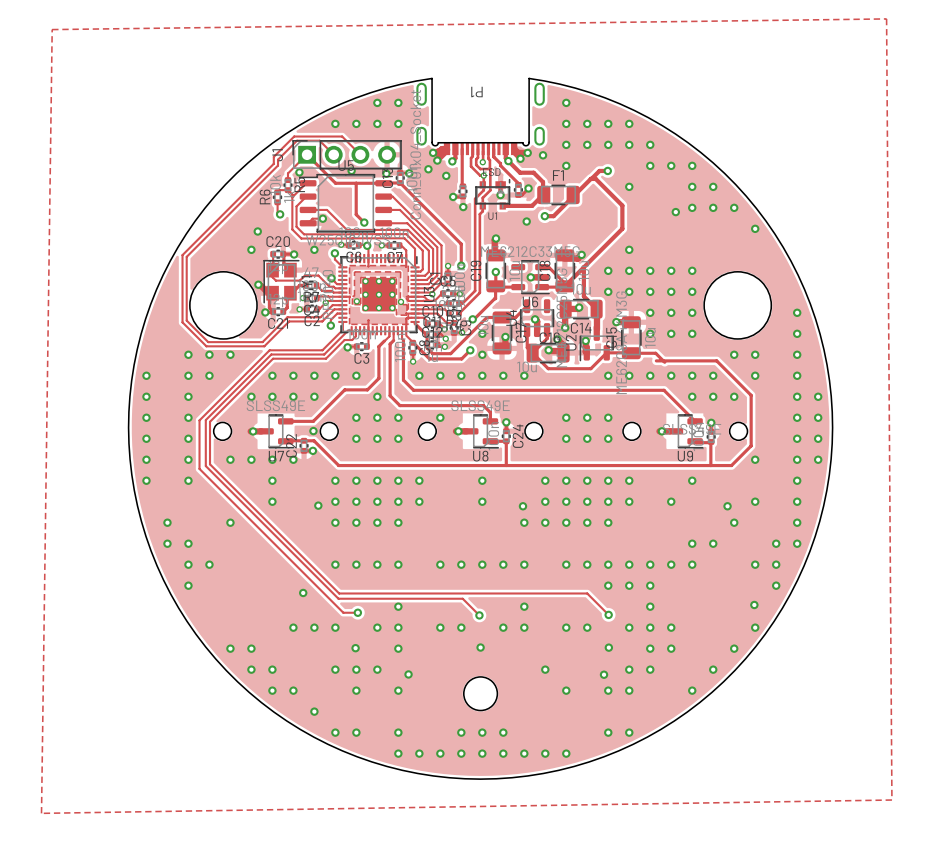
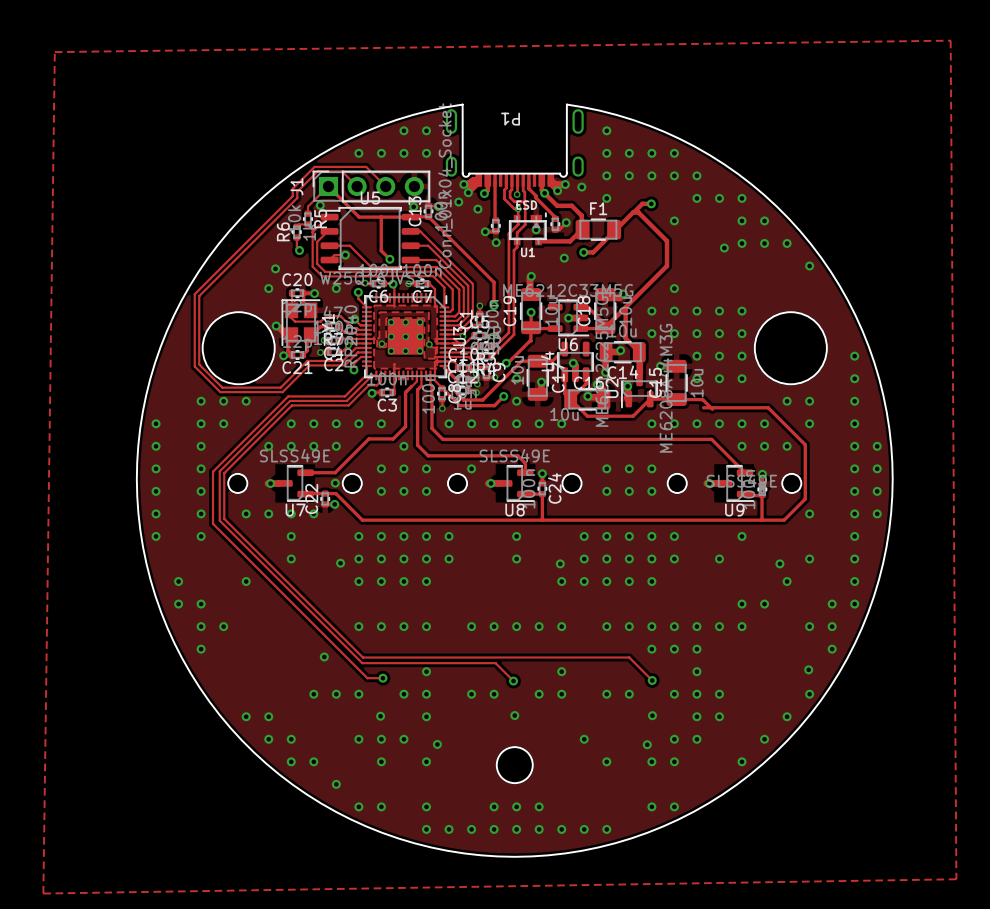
via: (351, 170) -> none

